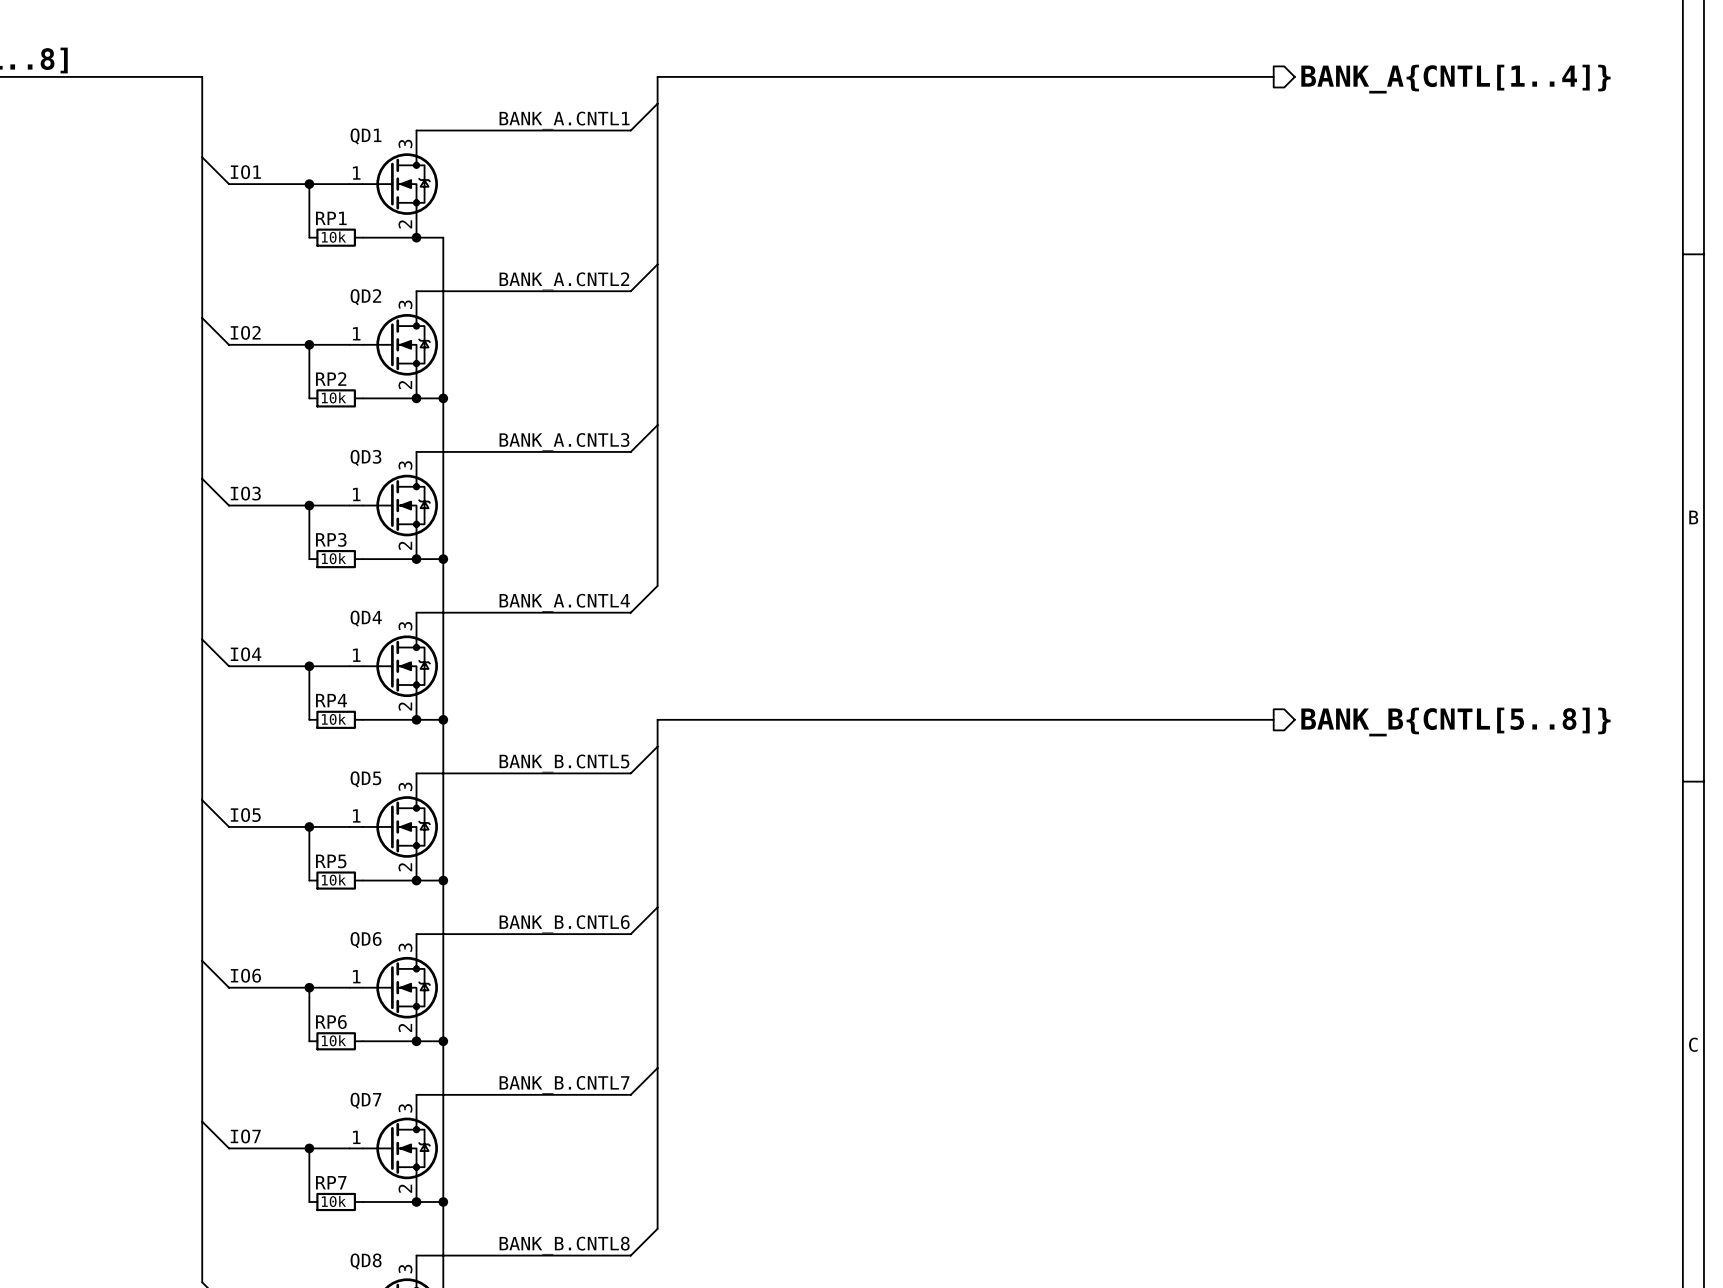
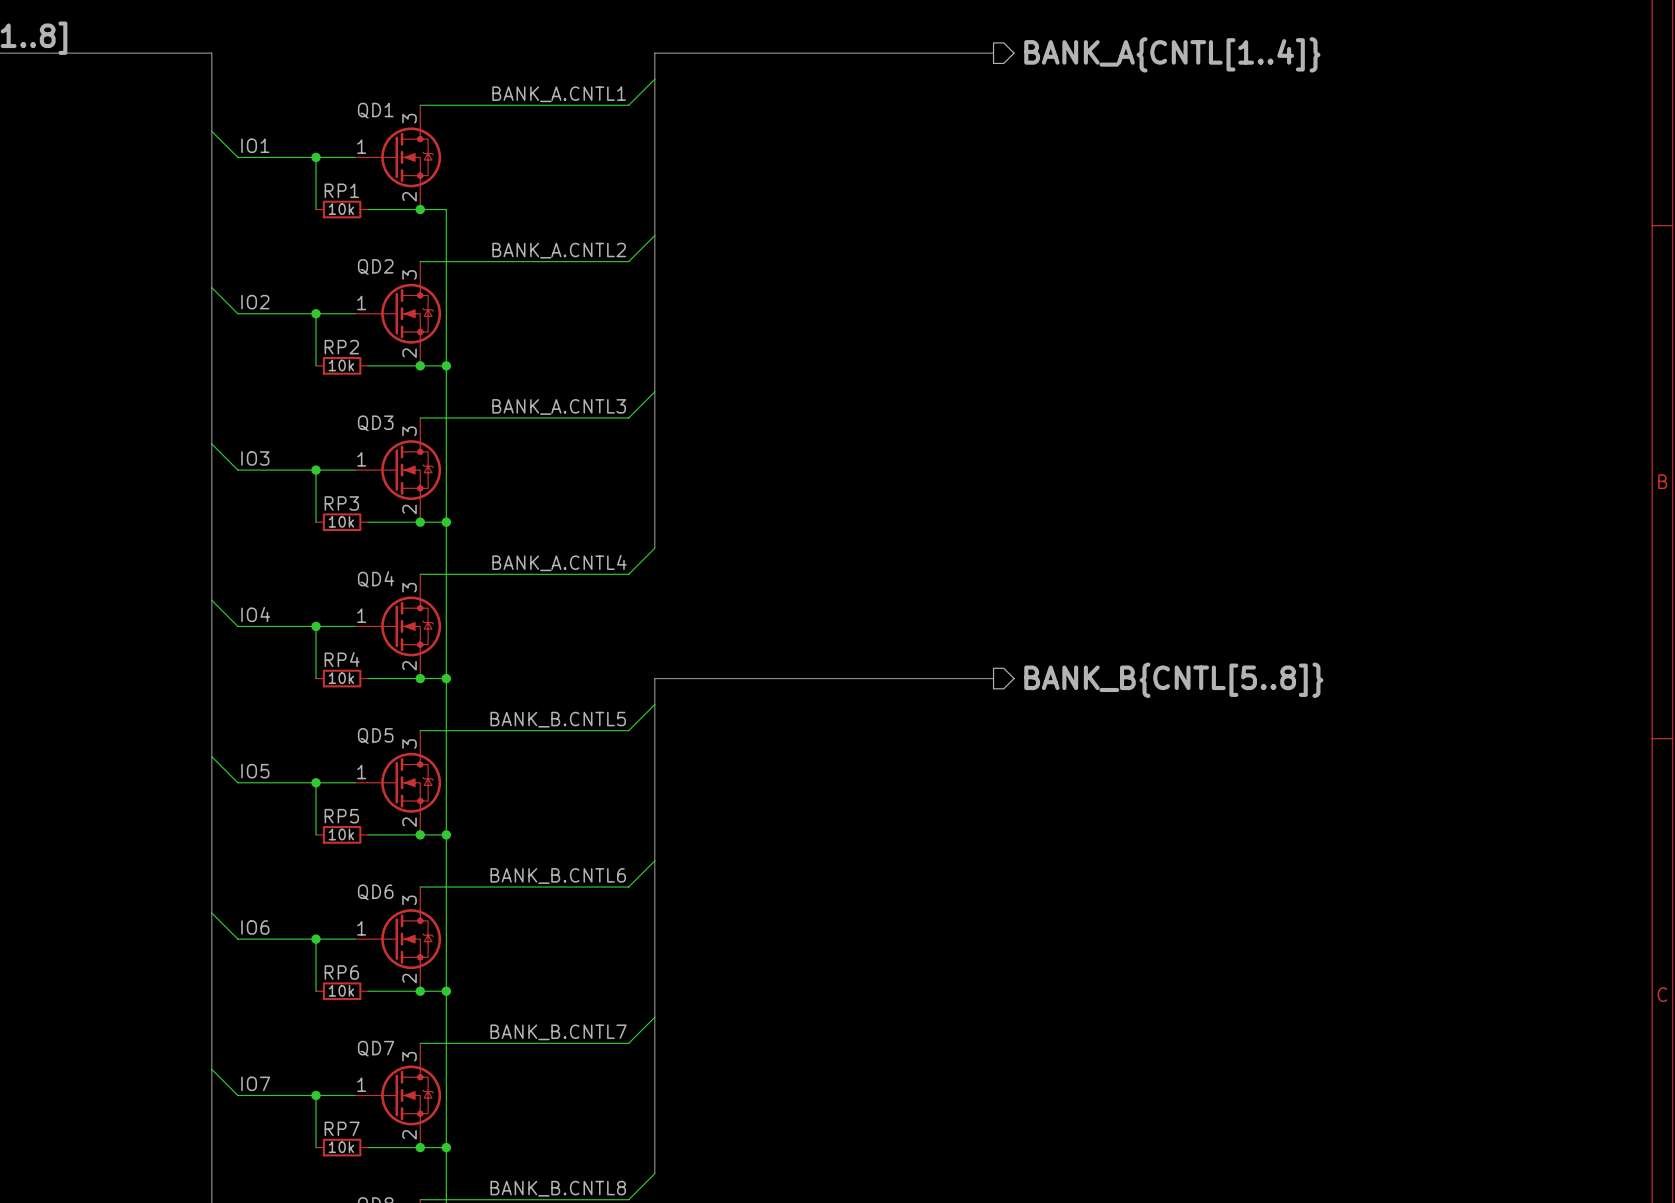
bus: (1005, 76) (1273, 76) -> none
hierarchical label: none -> BANK_A{CNTL[1..4]} (1172, 54)
hierarchical label: BANK_A{CNTL[1..4]} (1455, 79) -> none
bus: (1005, 719) (1273, 719) -> none
hierarchical label: none -> BANK_B{CNTL[5..8]} (1173, 680)
hierarchical label: BANK_B{CNTL[5..8]} (1455, 722) -> none

